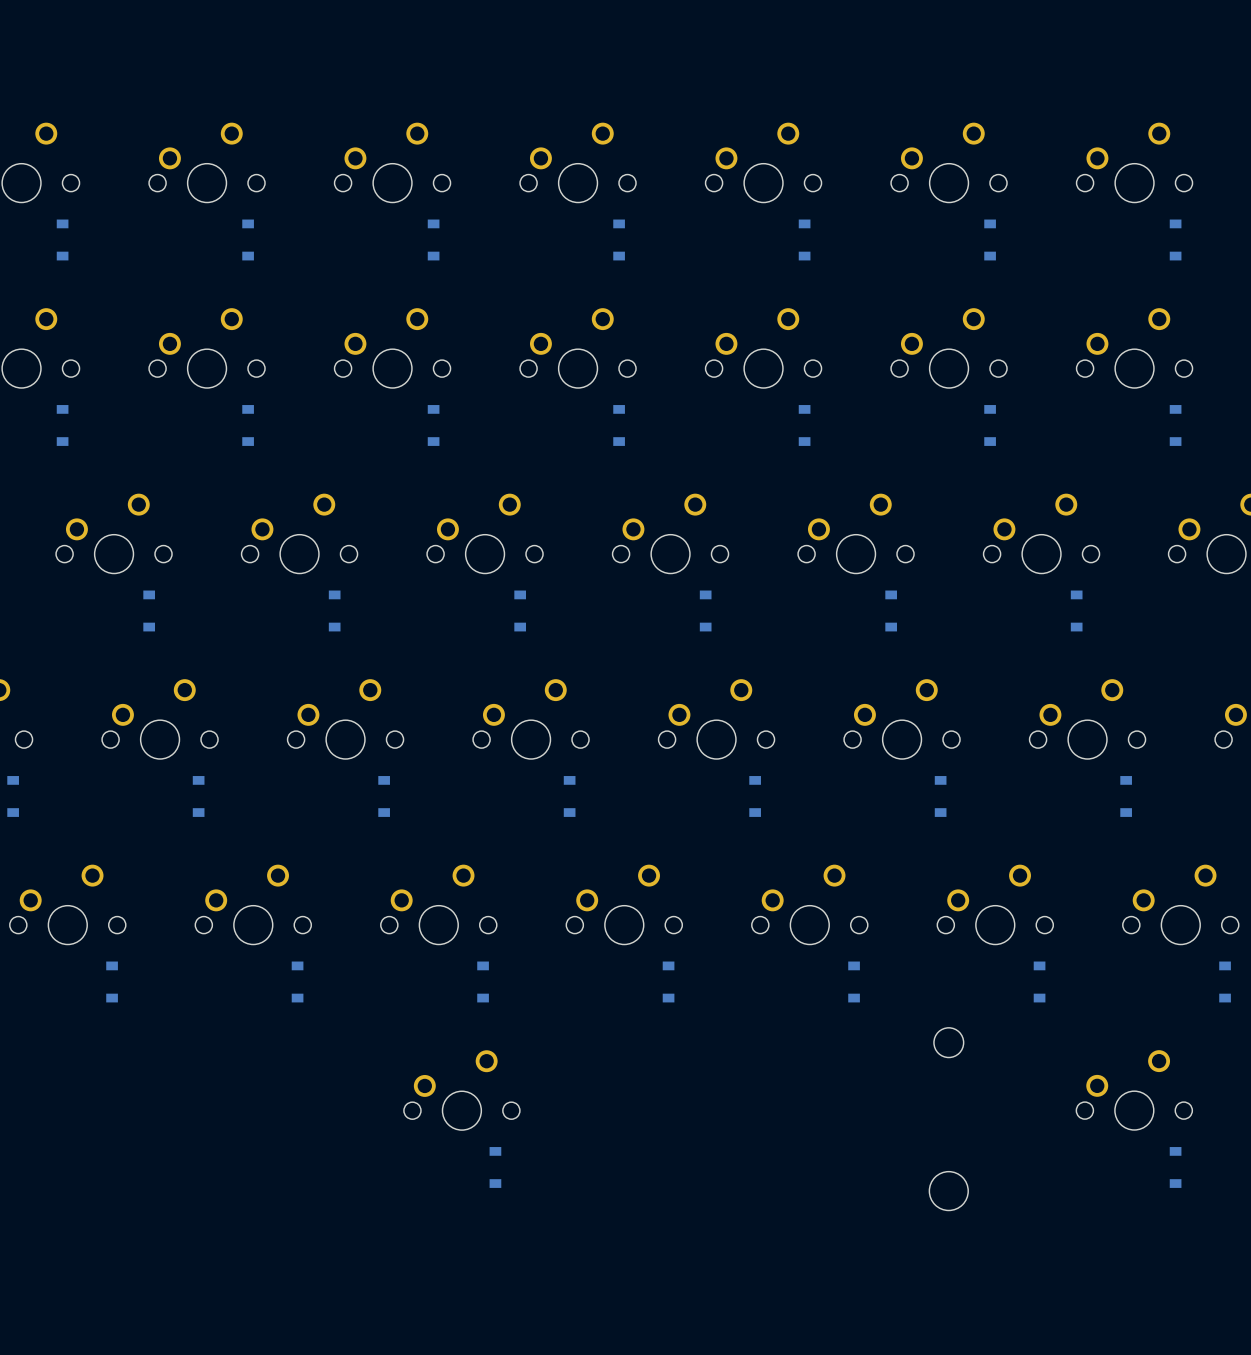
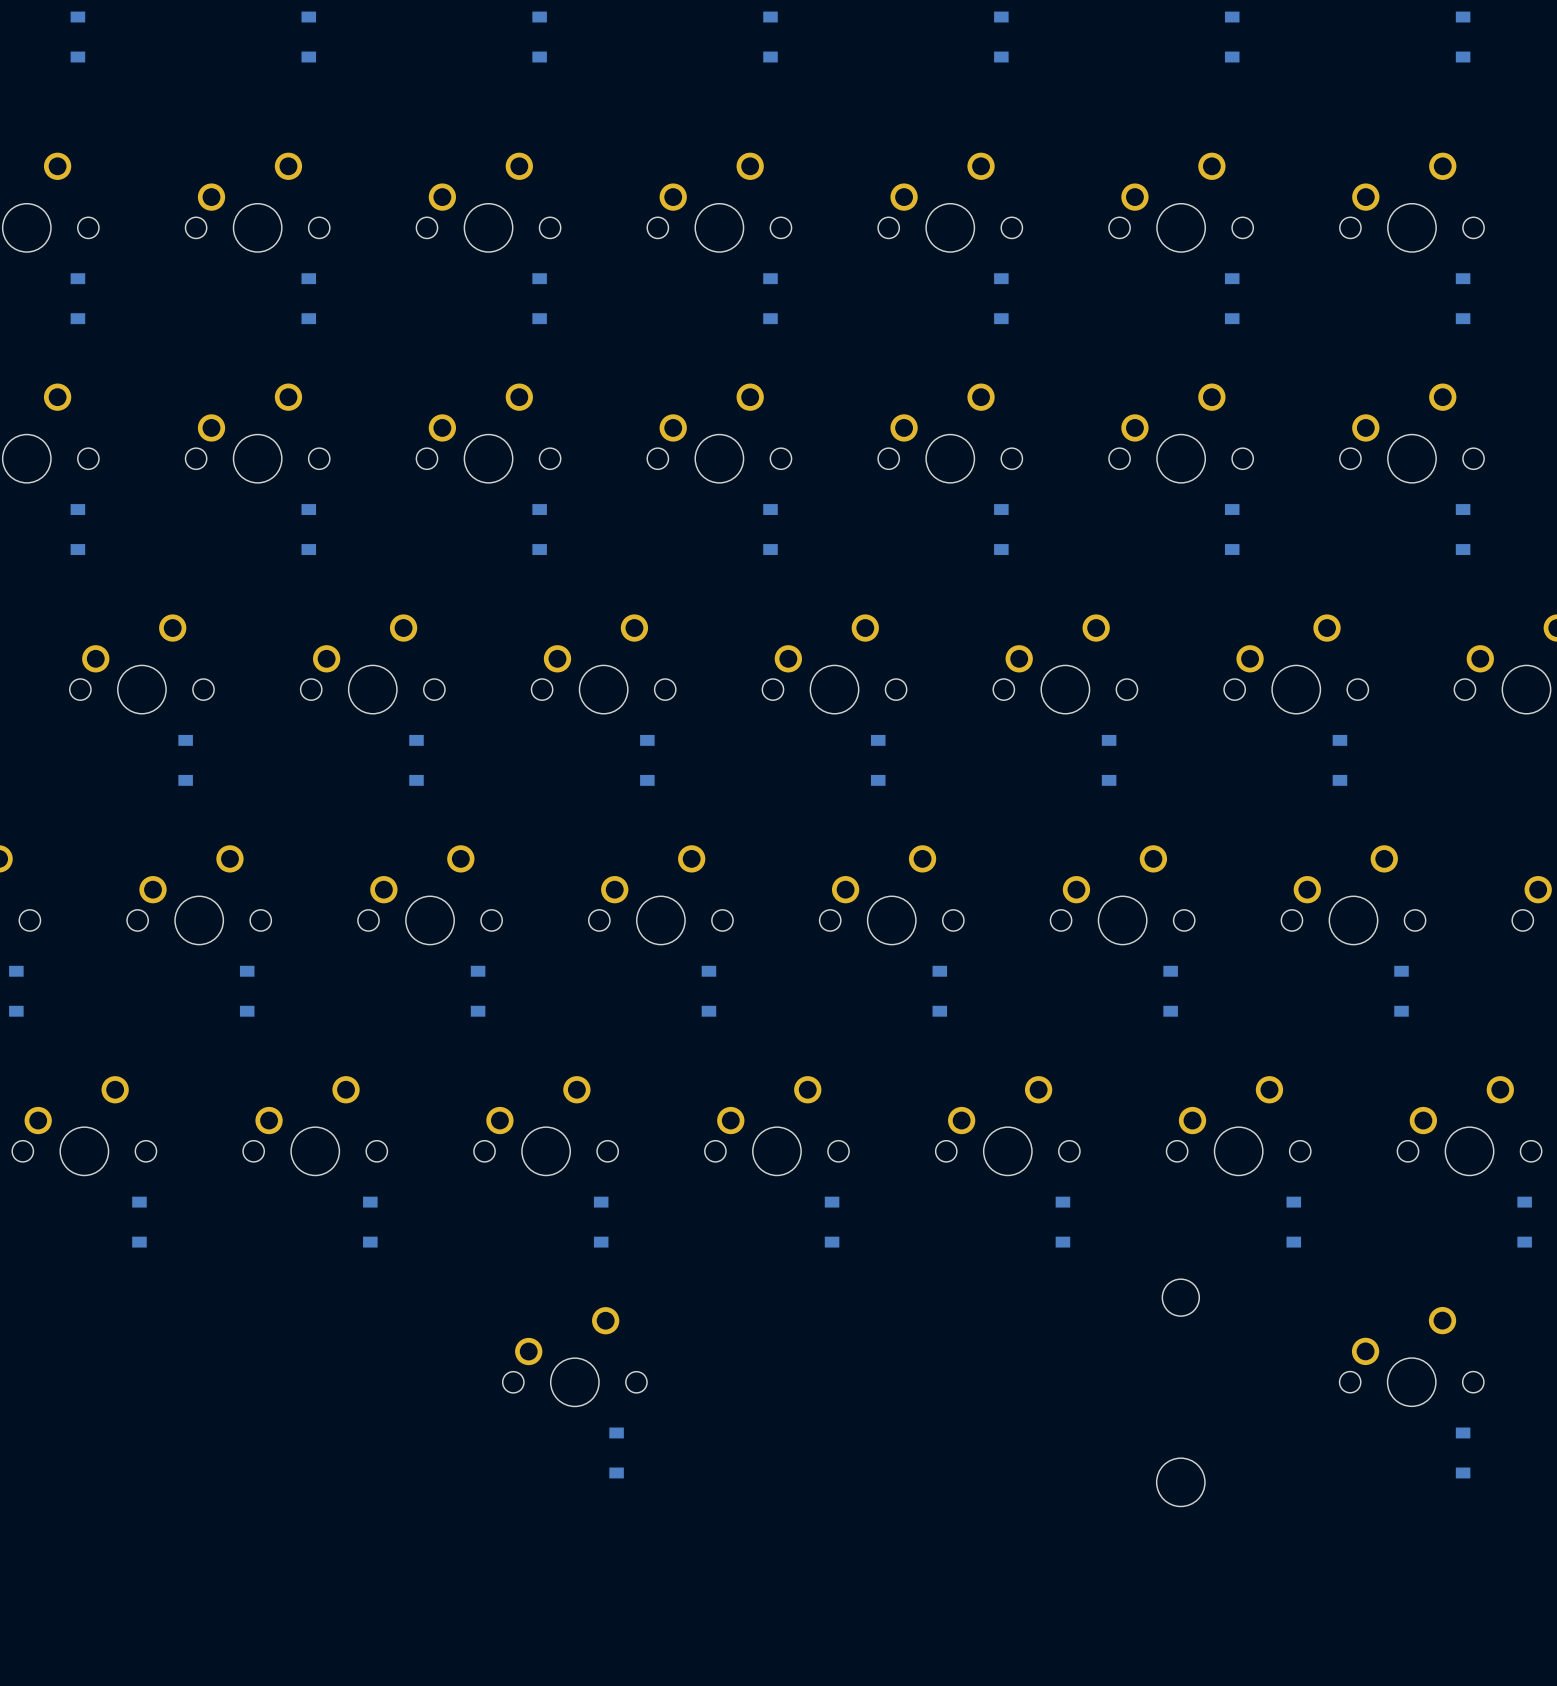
part: none -> (77, 37)
part: none -> (308, 37)
part: none -> (539, 37)
part: none -> (770, 37)
part: none -> (1001, 37)
part: none -> (1232, 37)
part: none -> (1463, 37)

